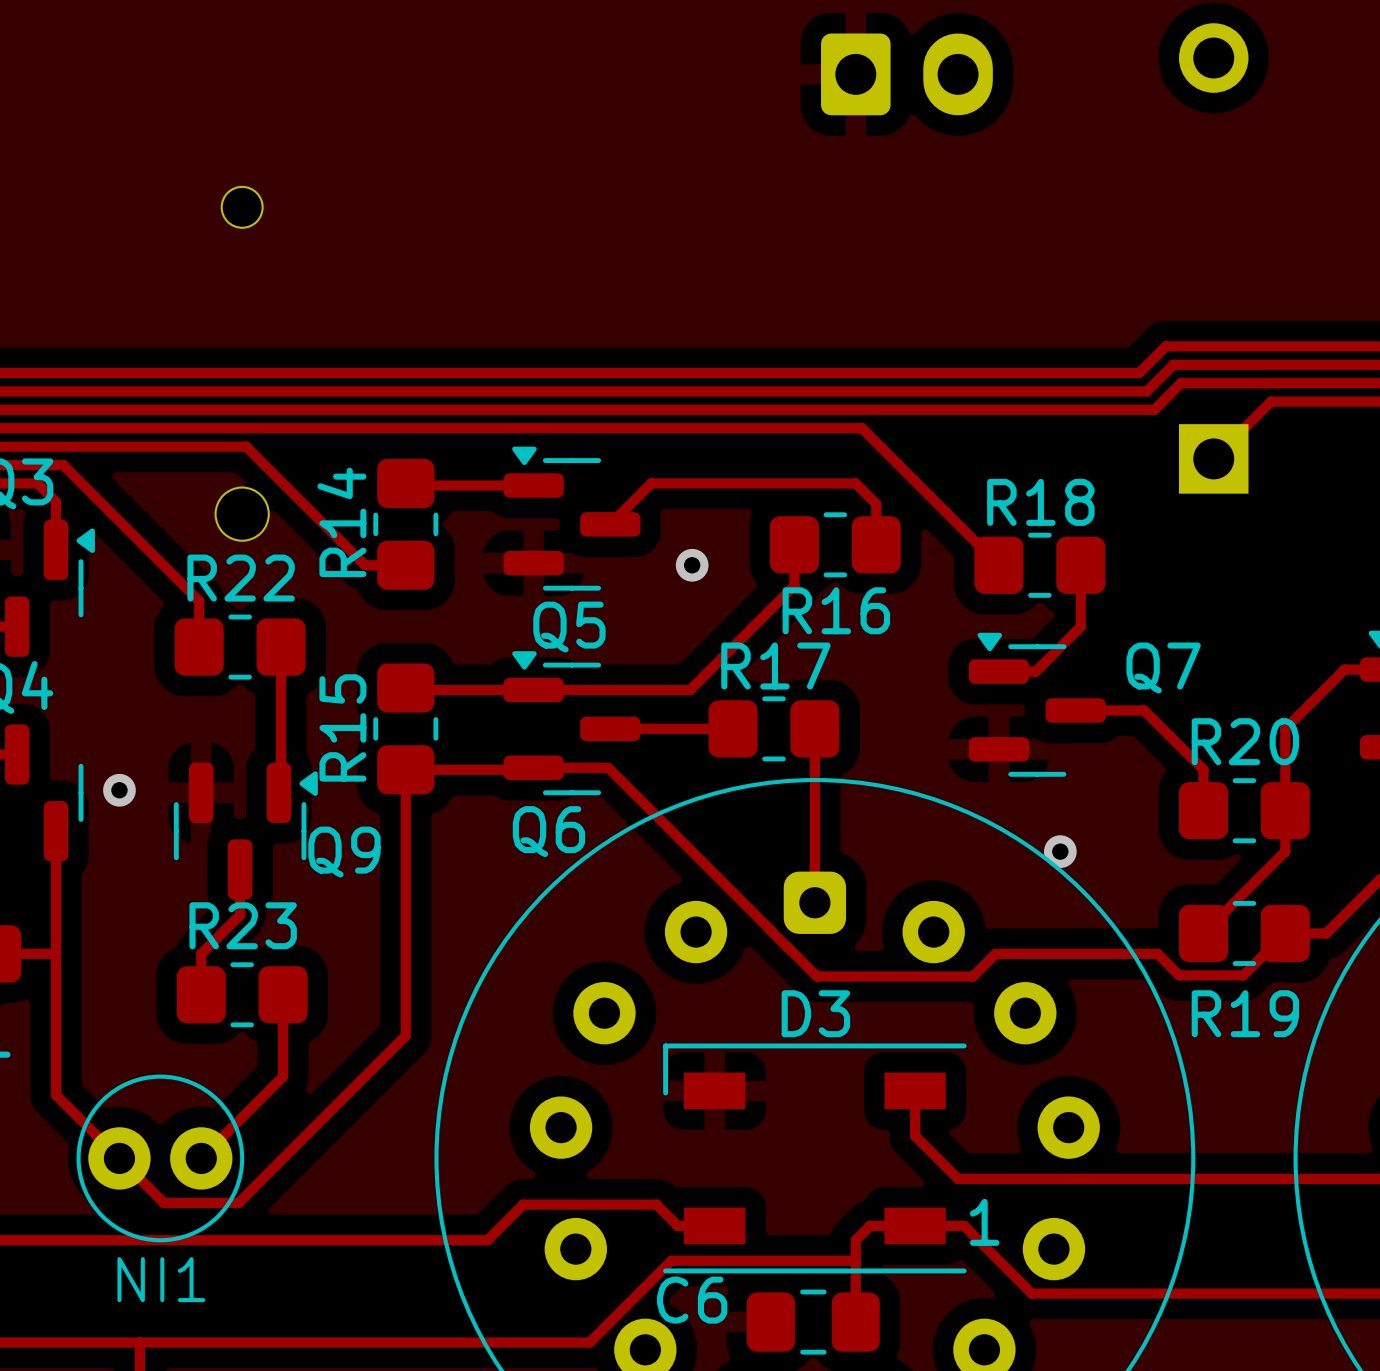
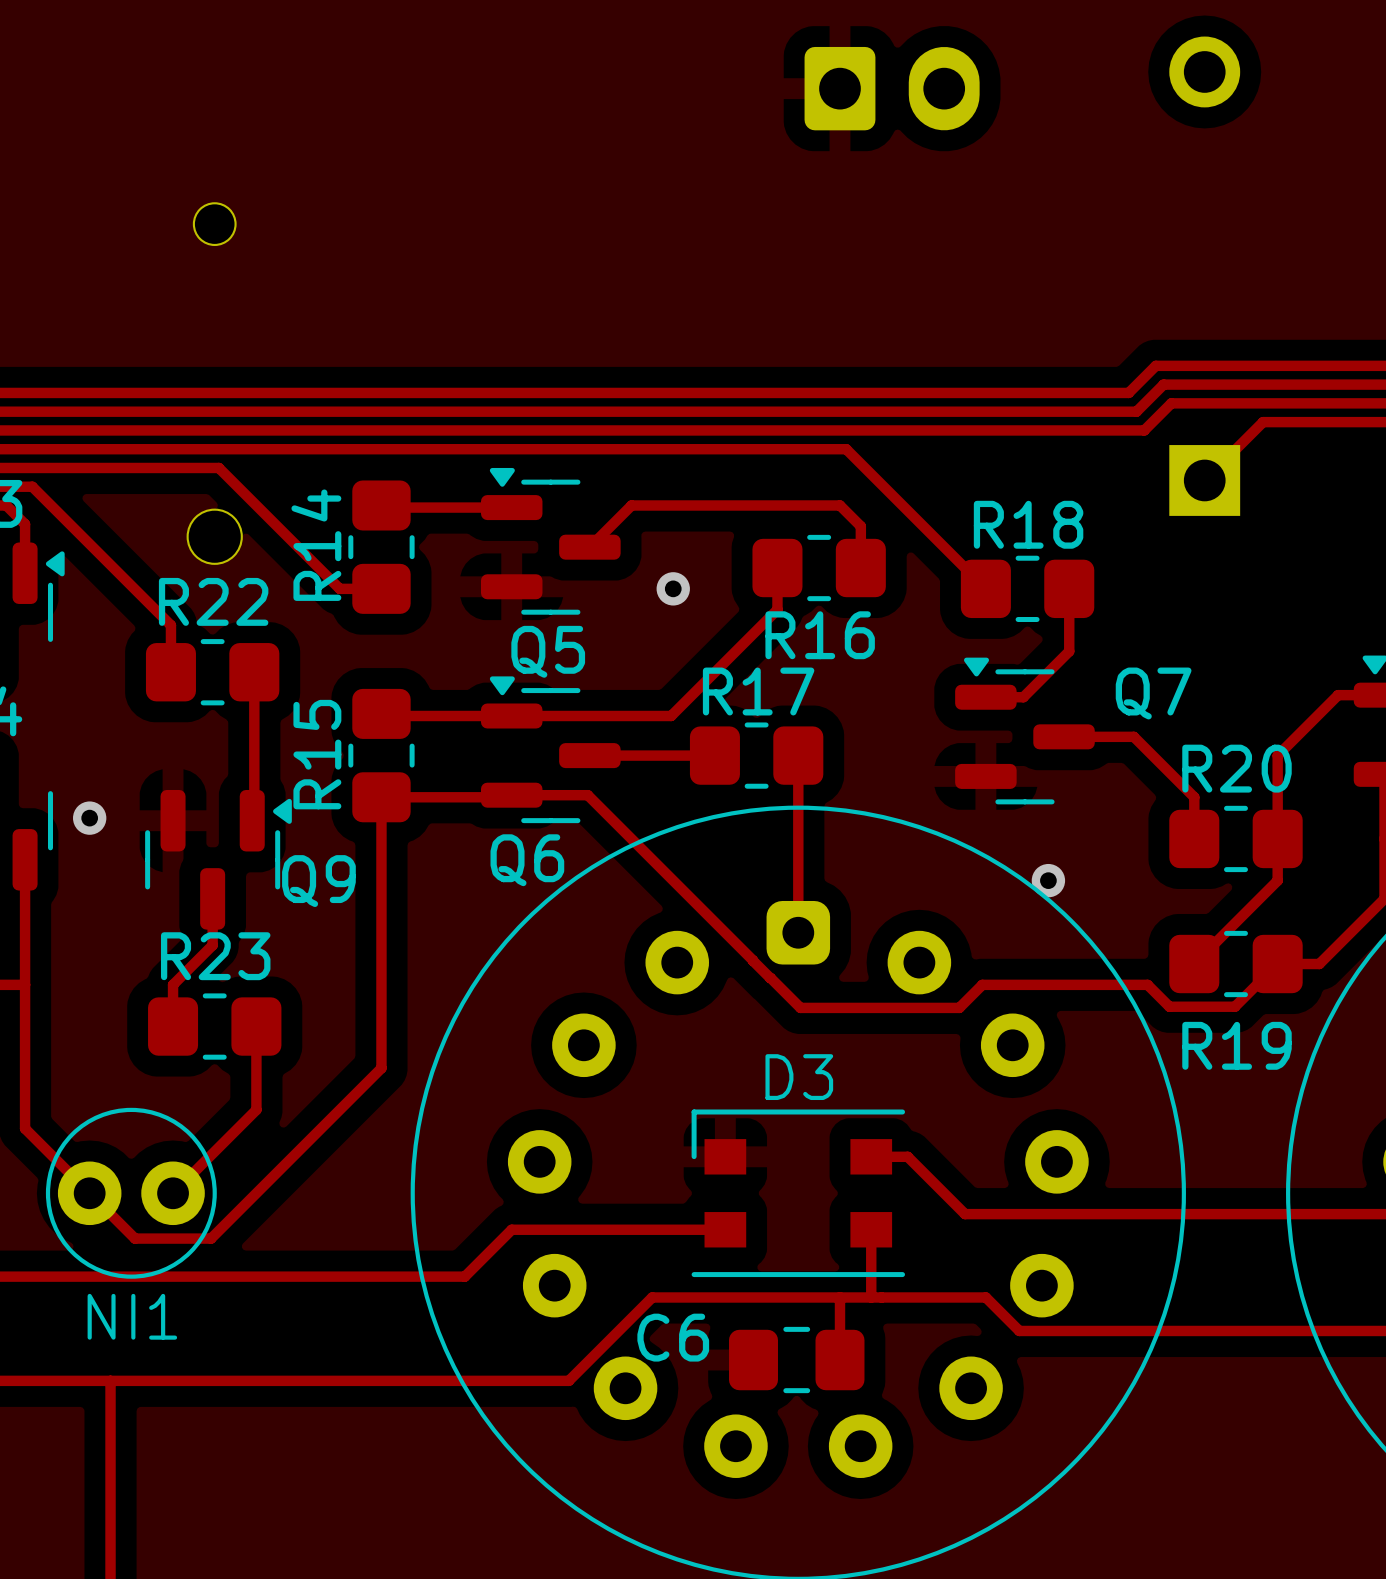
D3 footprint: [663, 1043, 967, 1274] -> [691, 1109, 906, 1278]
track: (915, 1090) (915, 1135) (958, 1178) (978, 1178) -> (871, 1156) (907, 1156) (965, 1214)
track: none -> (871, 1229) (871, 1297)
track: (523, 1204) (656, 1204) (677, 1225) (714, 1225) -> (501, 1240) (511, 1229) (725, 1229)
track: (855, 1260) (855, 1240) (870, 1225) (964, 1225) (998, 1260) -> (839, 1297) (985, 1297)

